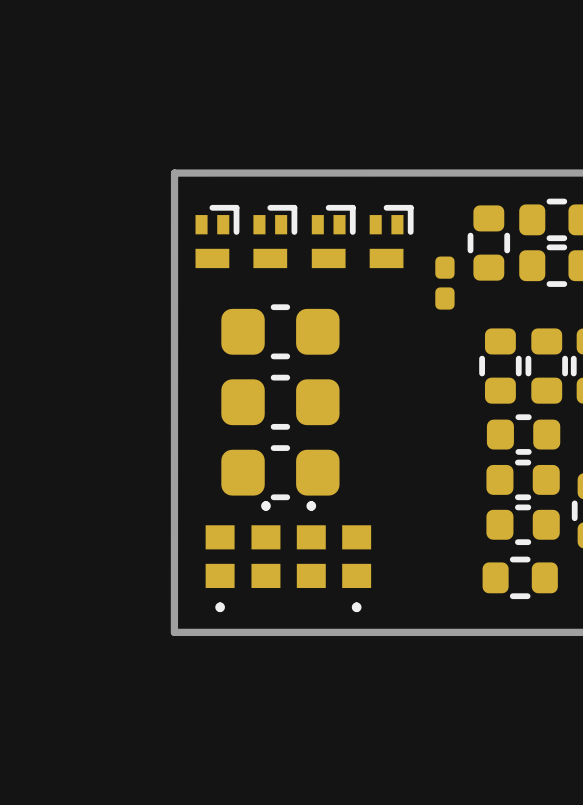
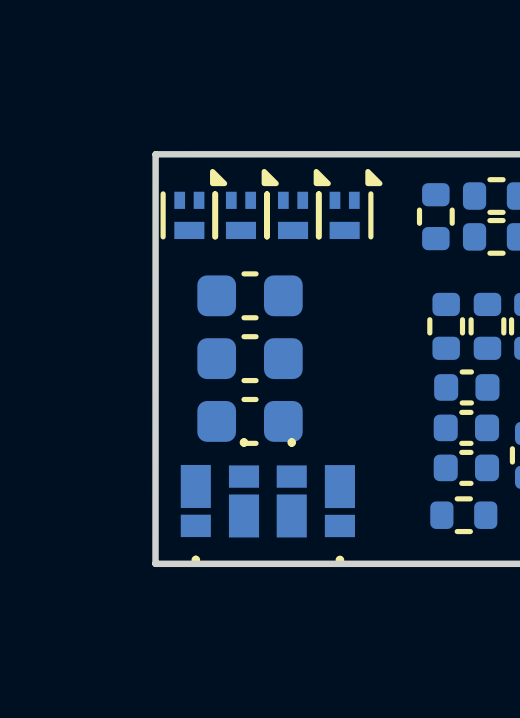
part footprint: [195, 204, 240, 269] -> [160, 168, 228, 240]
part footprint: [253, 204, 298, 269] -> [212, 168, 279, 240]
part footprint: [311, 204, 356, 269] -> [264, 168, 331, 240]
part footprint: [369, 204, 414, 269] -> [315, 168, 383, 240]
part: (444, 283) -> none
part footprint: [251, 501, 281, 588] -> [228, 438, 260, 538]
part footprint: [296, 501, 326, 588] -> [276, 438, 307, 538]
part footprint: [205, 525, 235, 613] -> [180, 464, 211, 565]
part: (356, 568) -> none
part: none -> (339, 514)

